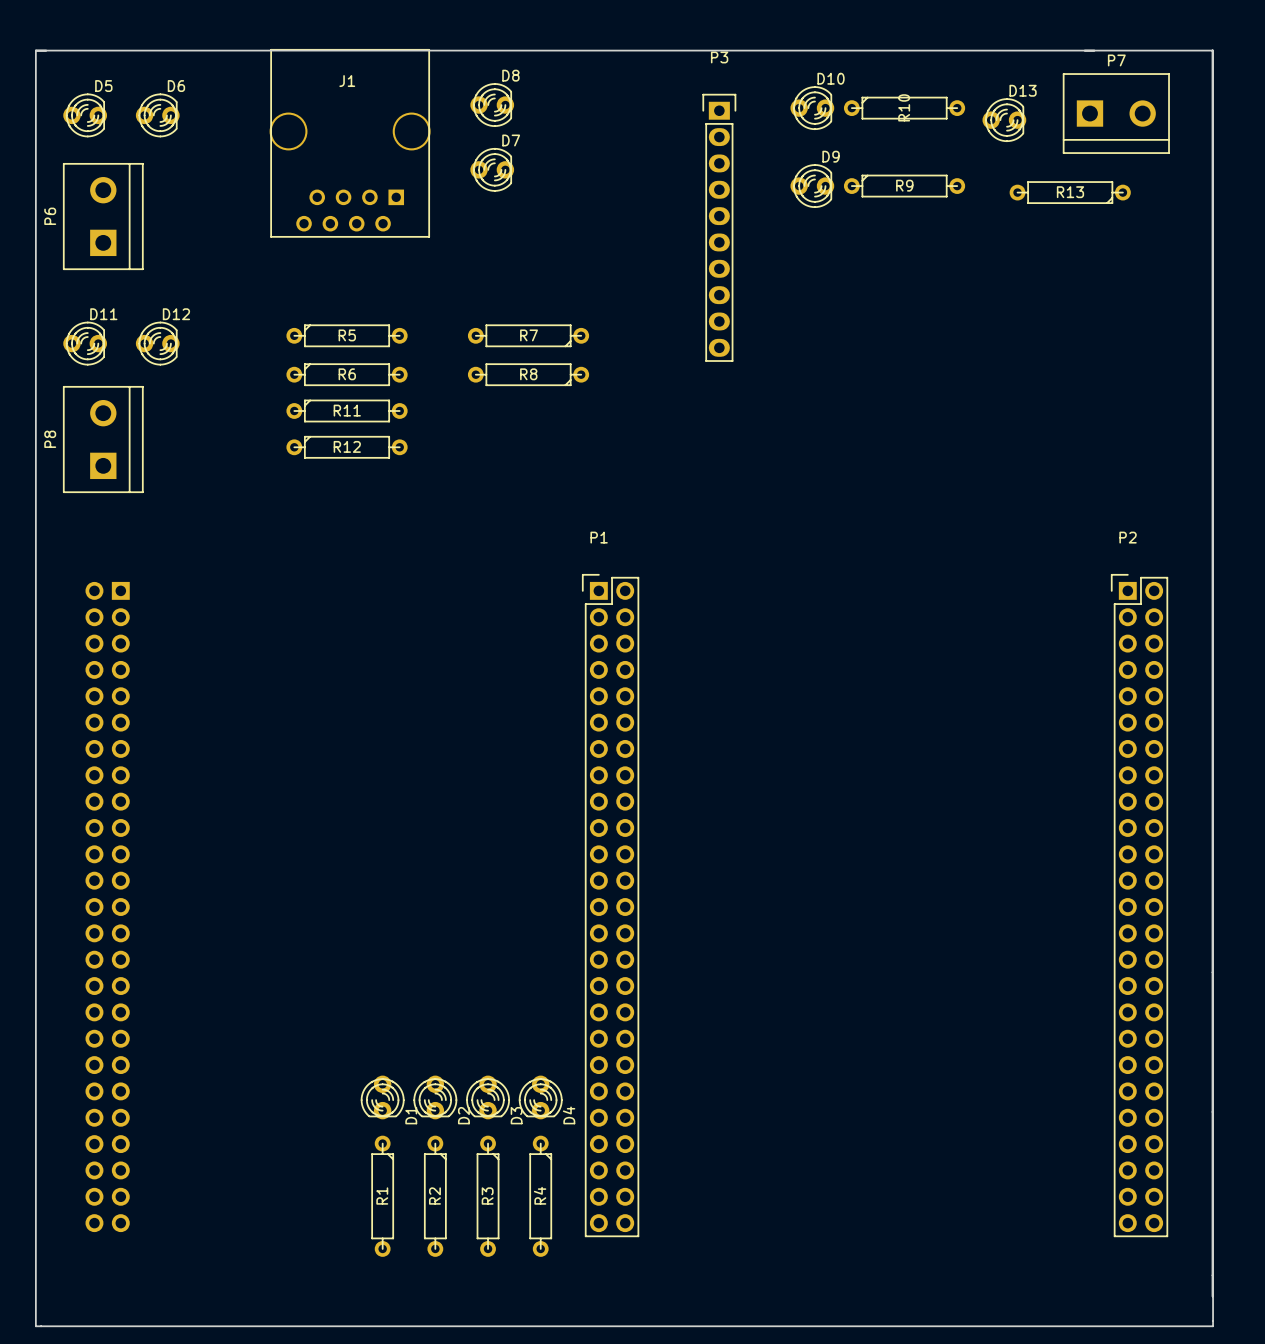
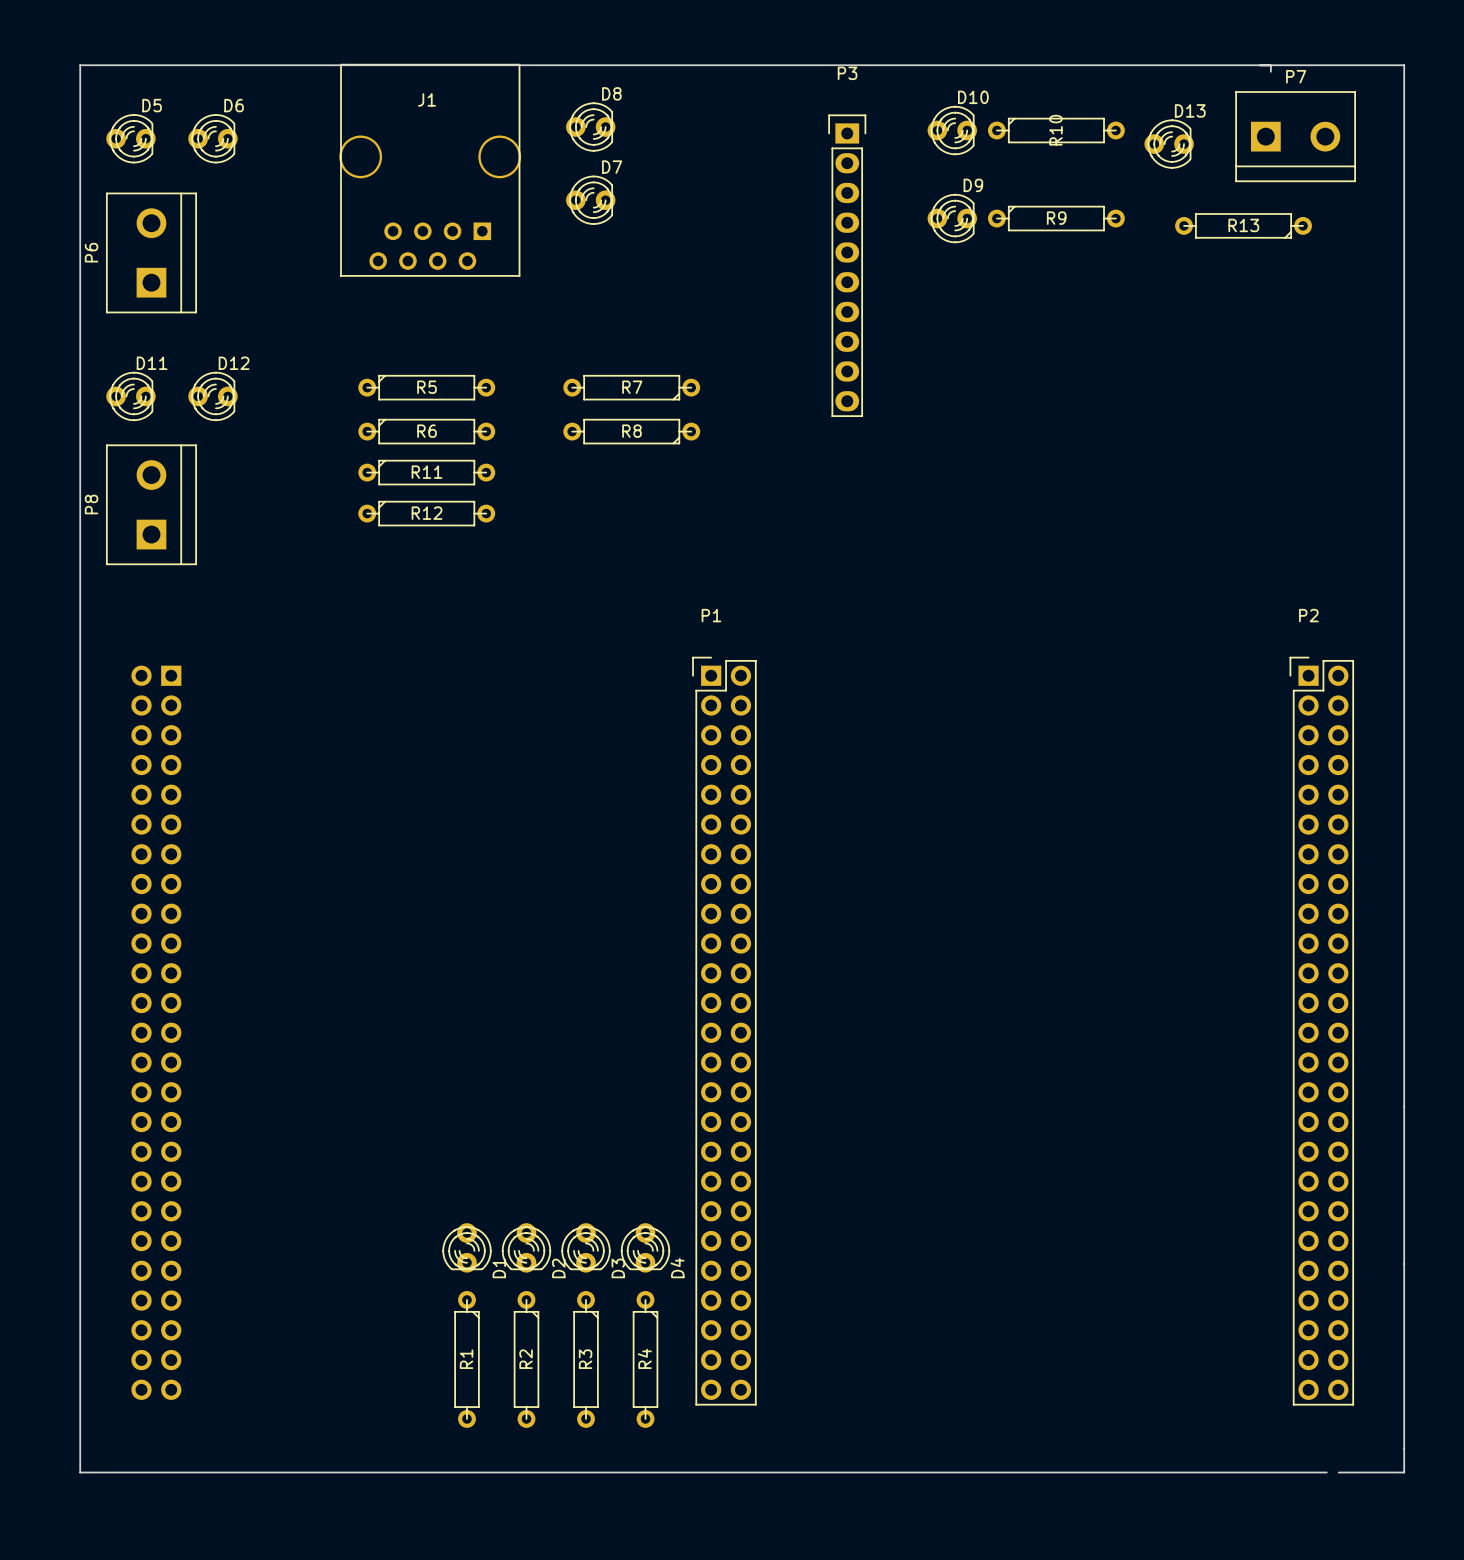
board edge: (1084, 50) (35, 50) (35, 1326) (1213, 1326) (1213, 50) (1094, 50) -> (1270, 71) (1270, 65)
board edge: none -> (1404, 65) (80, 65) (80, 1472) (1326, 1472)
board edge: none -> (1338, 1472) (1404, 1472)

